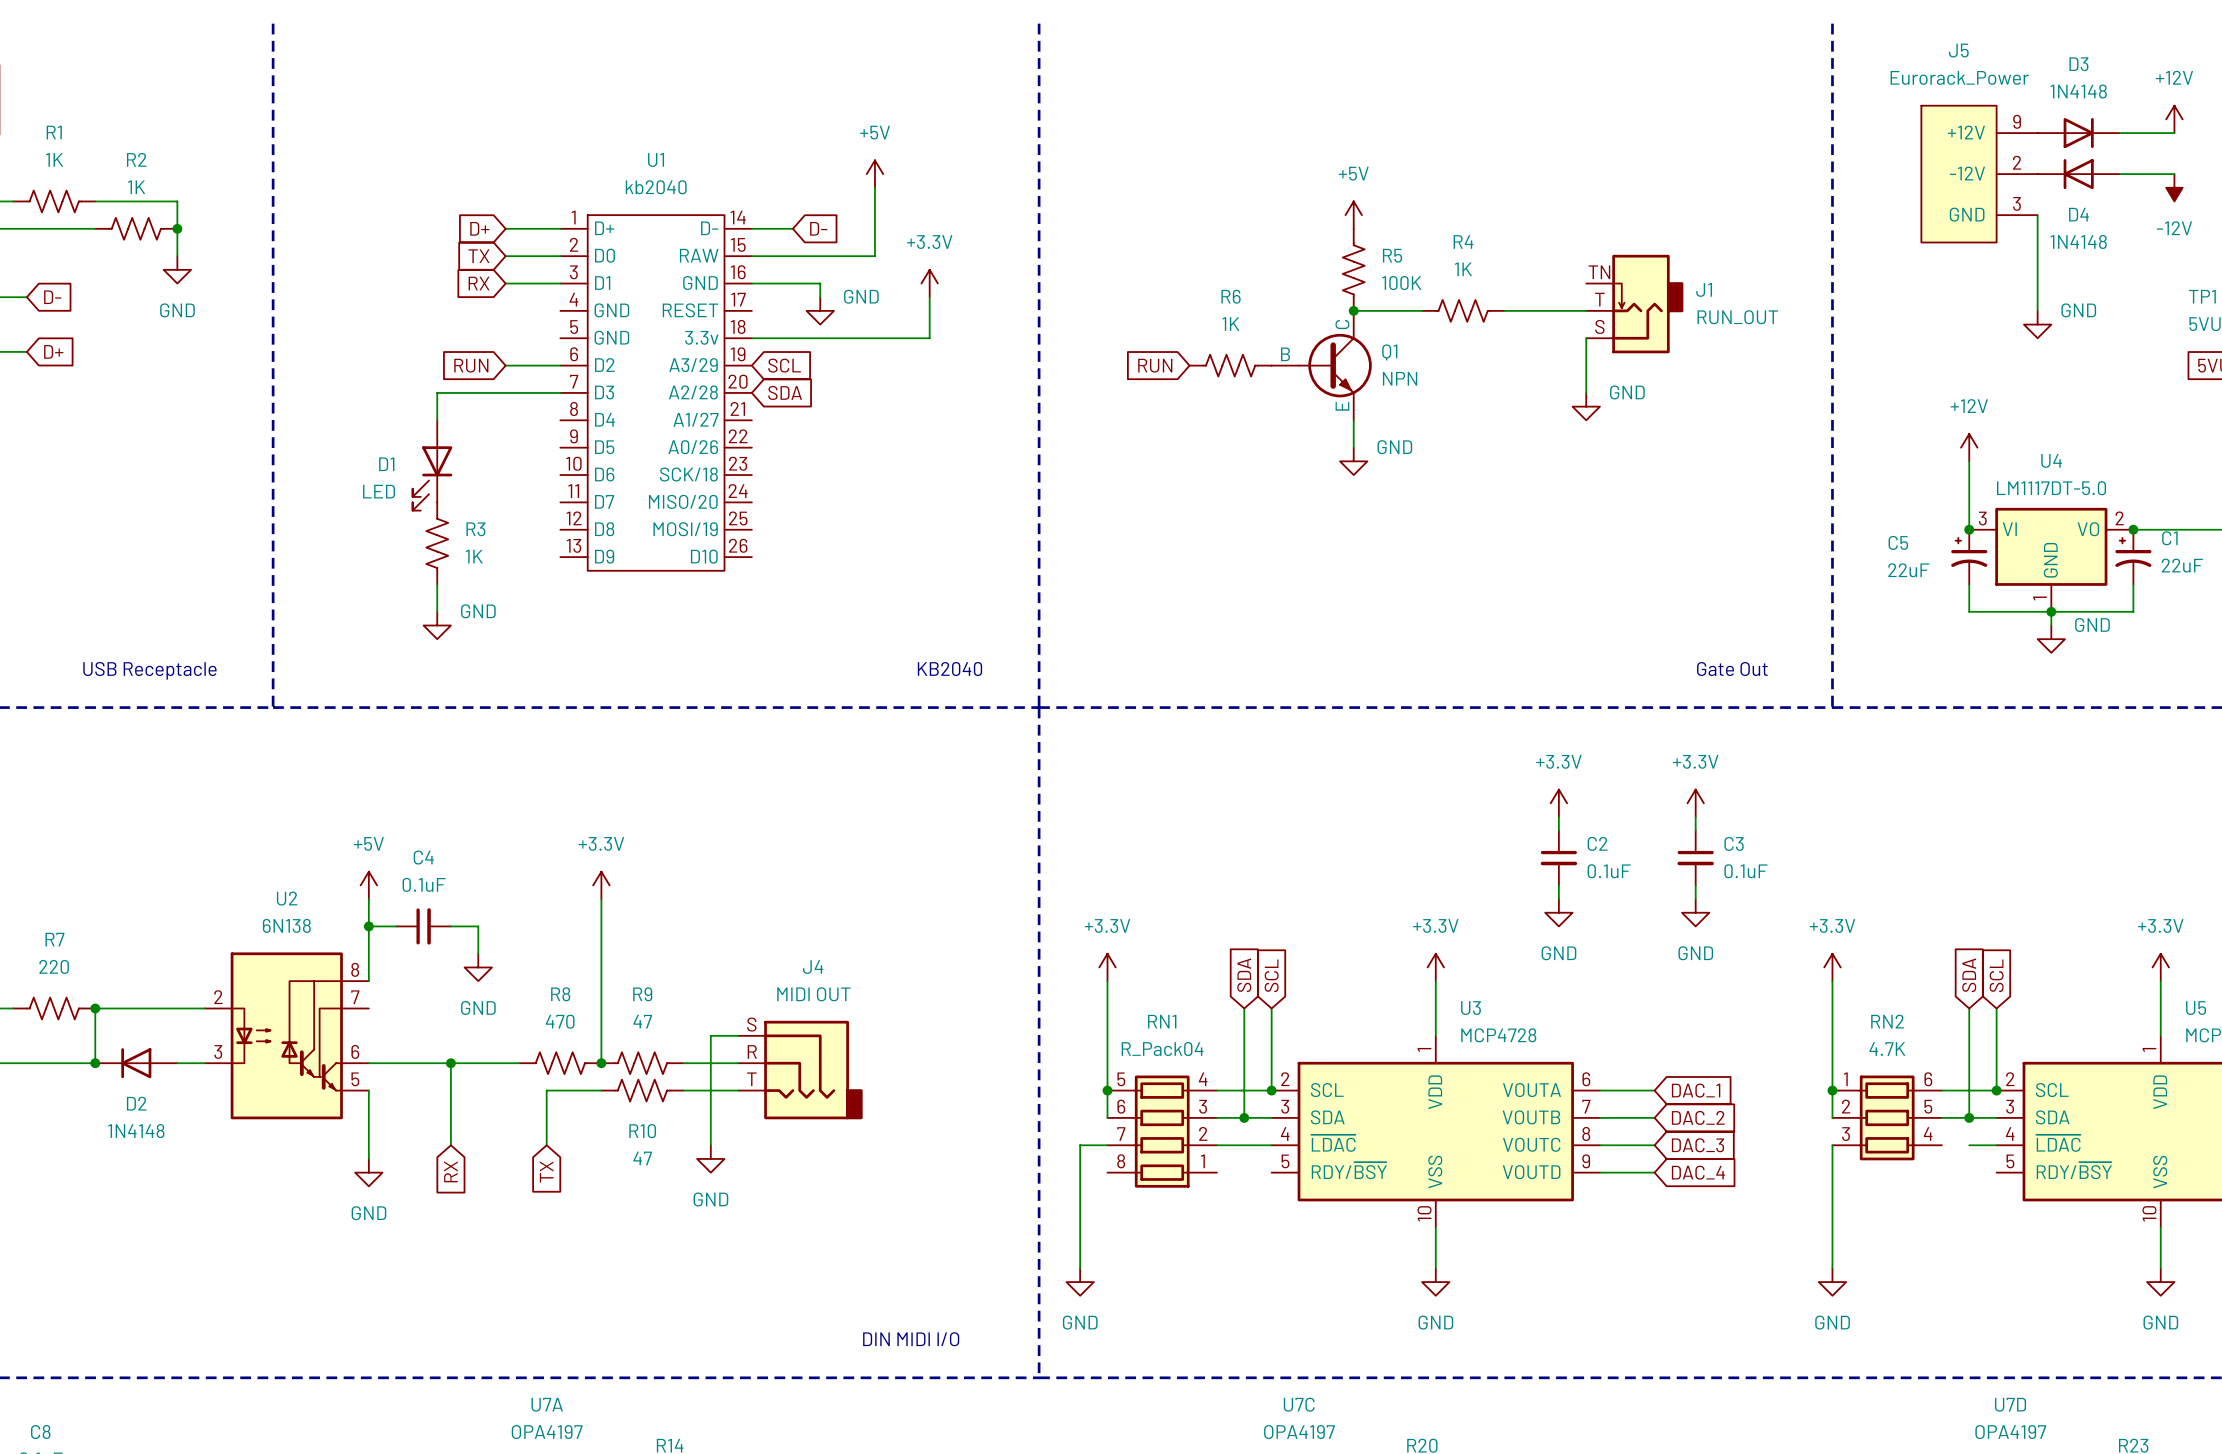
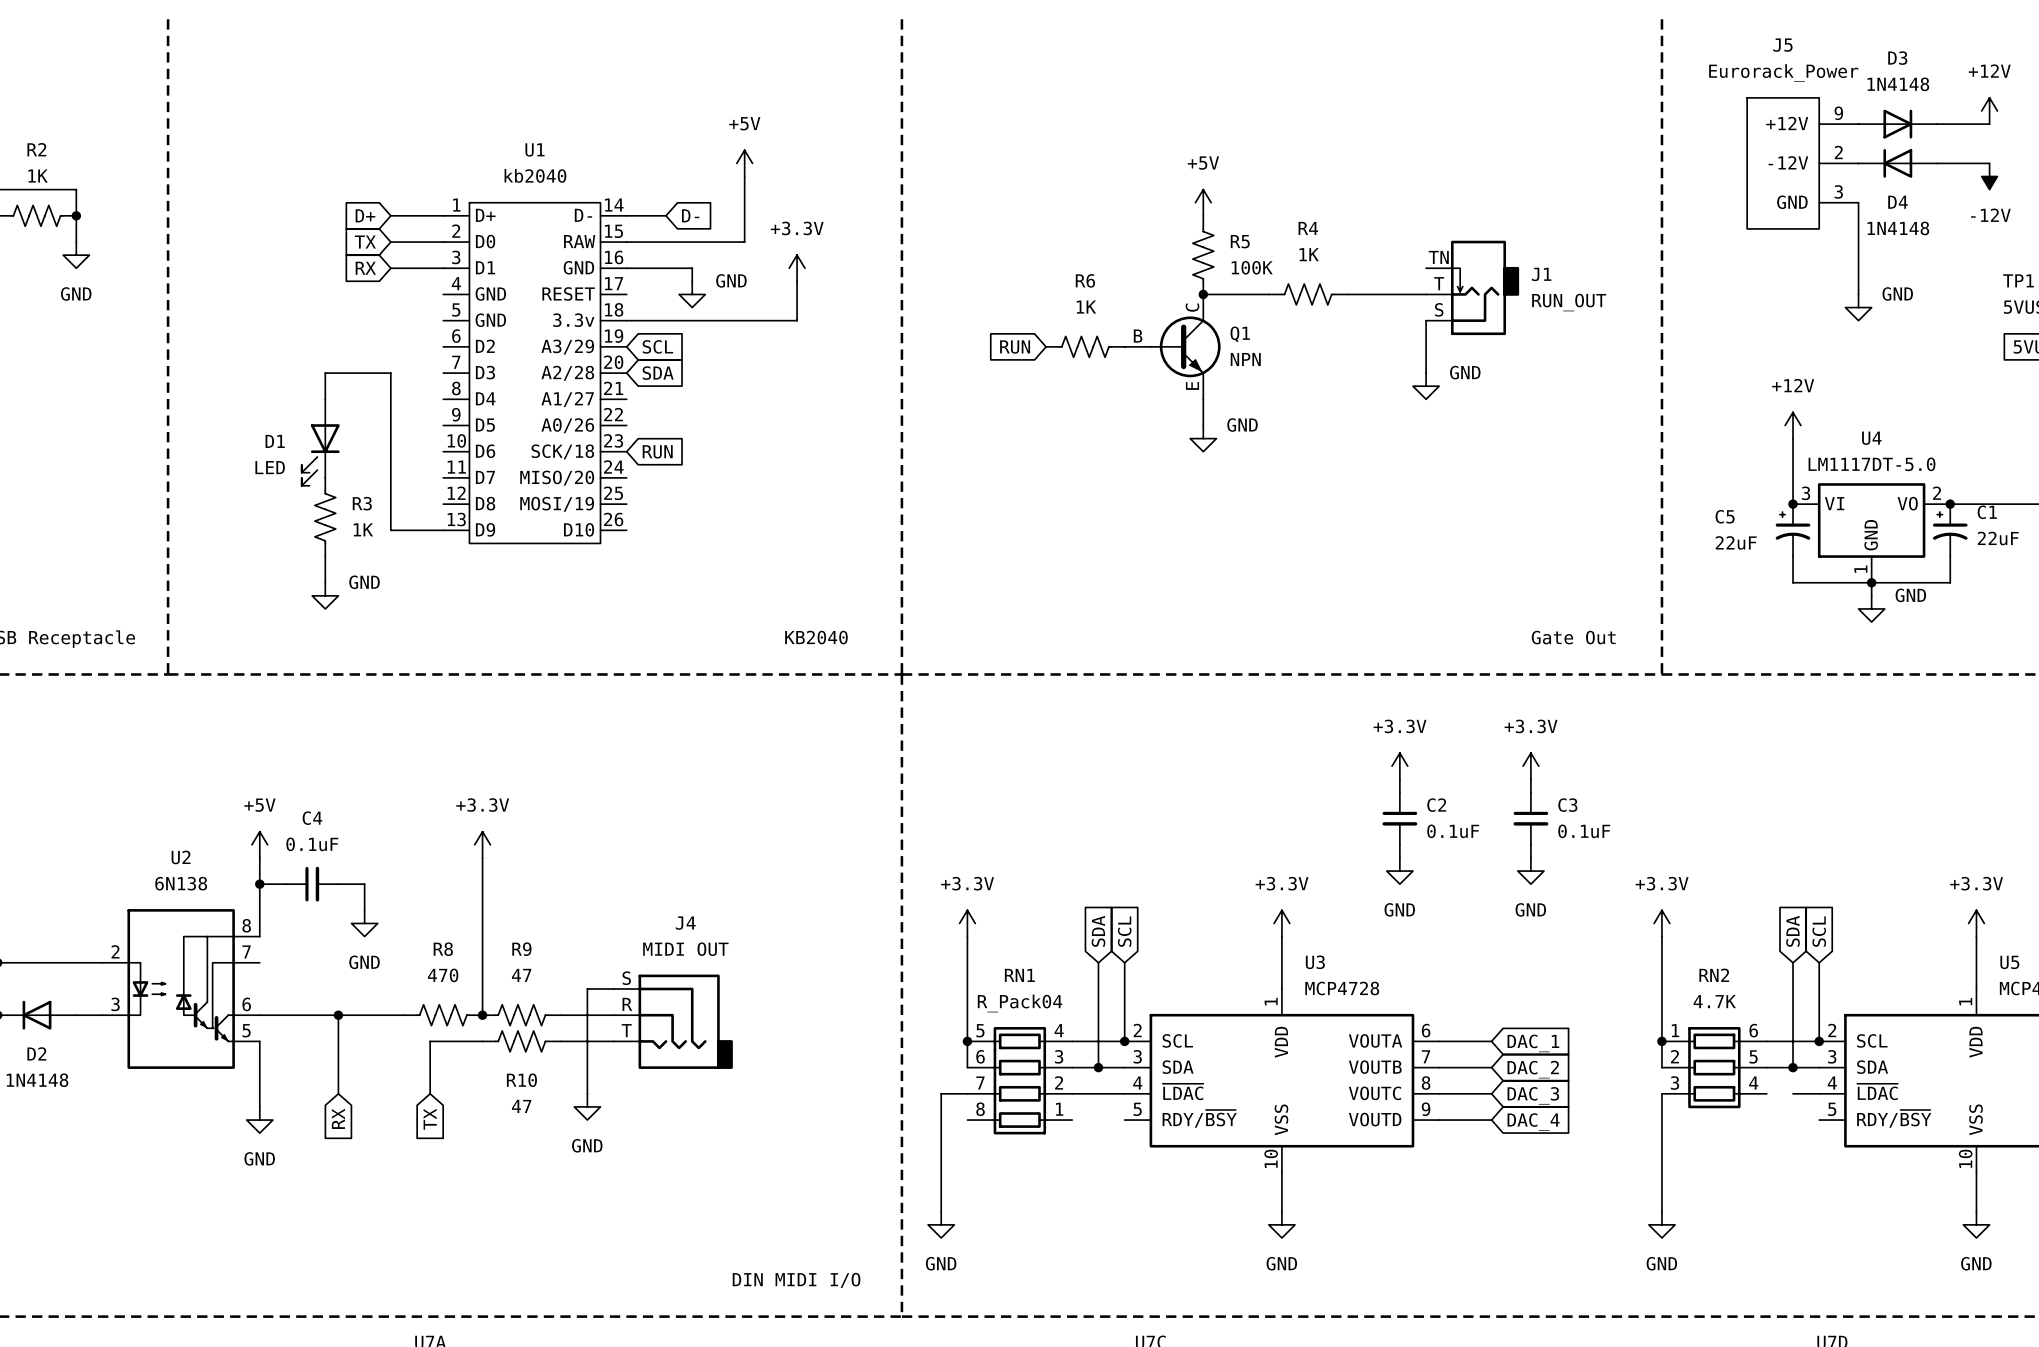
global label: RUN (471, 365) -> none
wire: (505, 365) (560, 365) -> none
wire: (505, 392) (560, 392) -> (390, 373) (390, 530) (443, 530)
global label: none -> RUN (657, 451)

